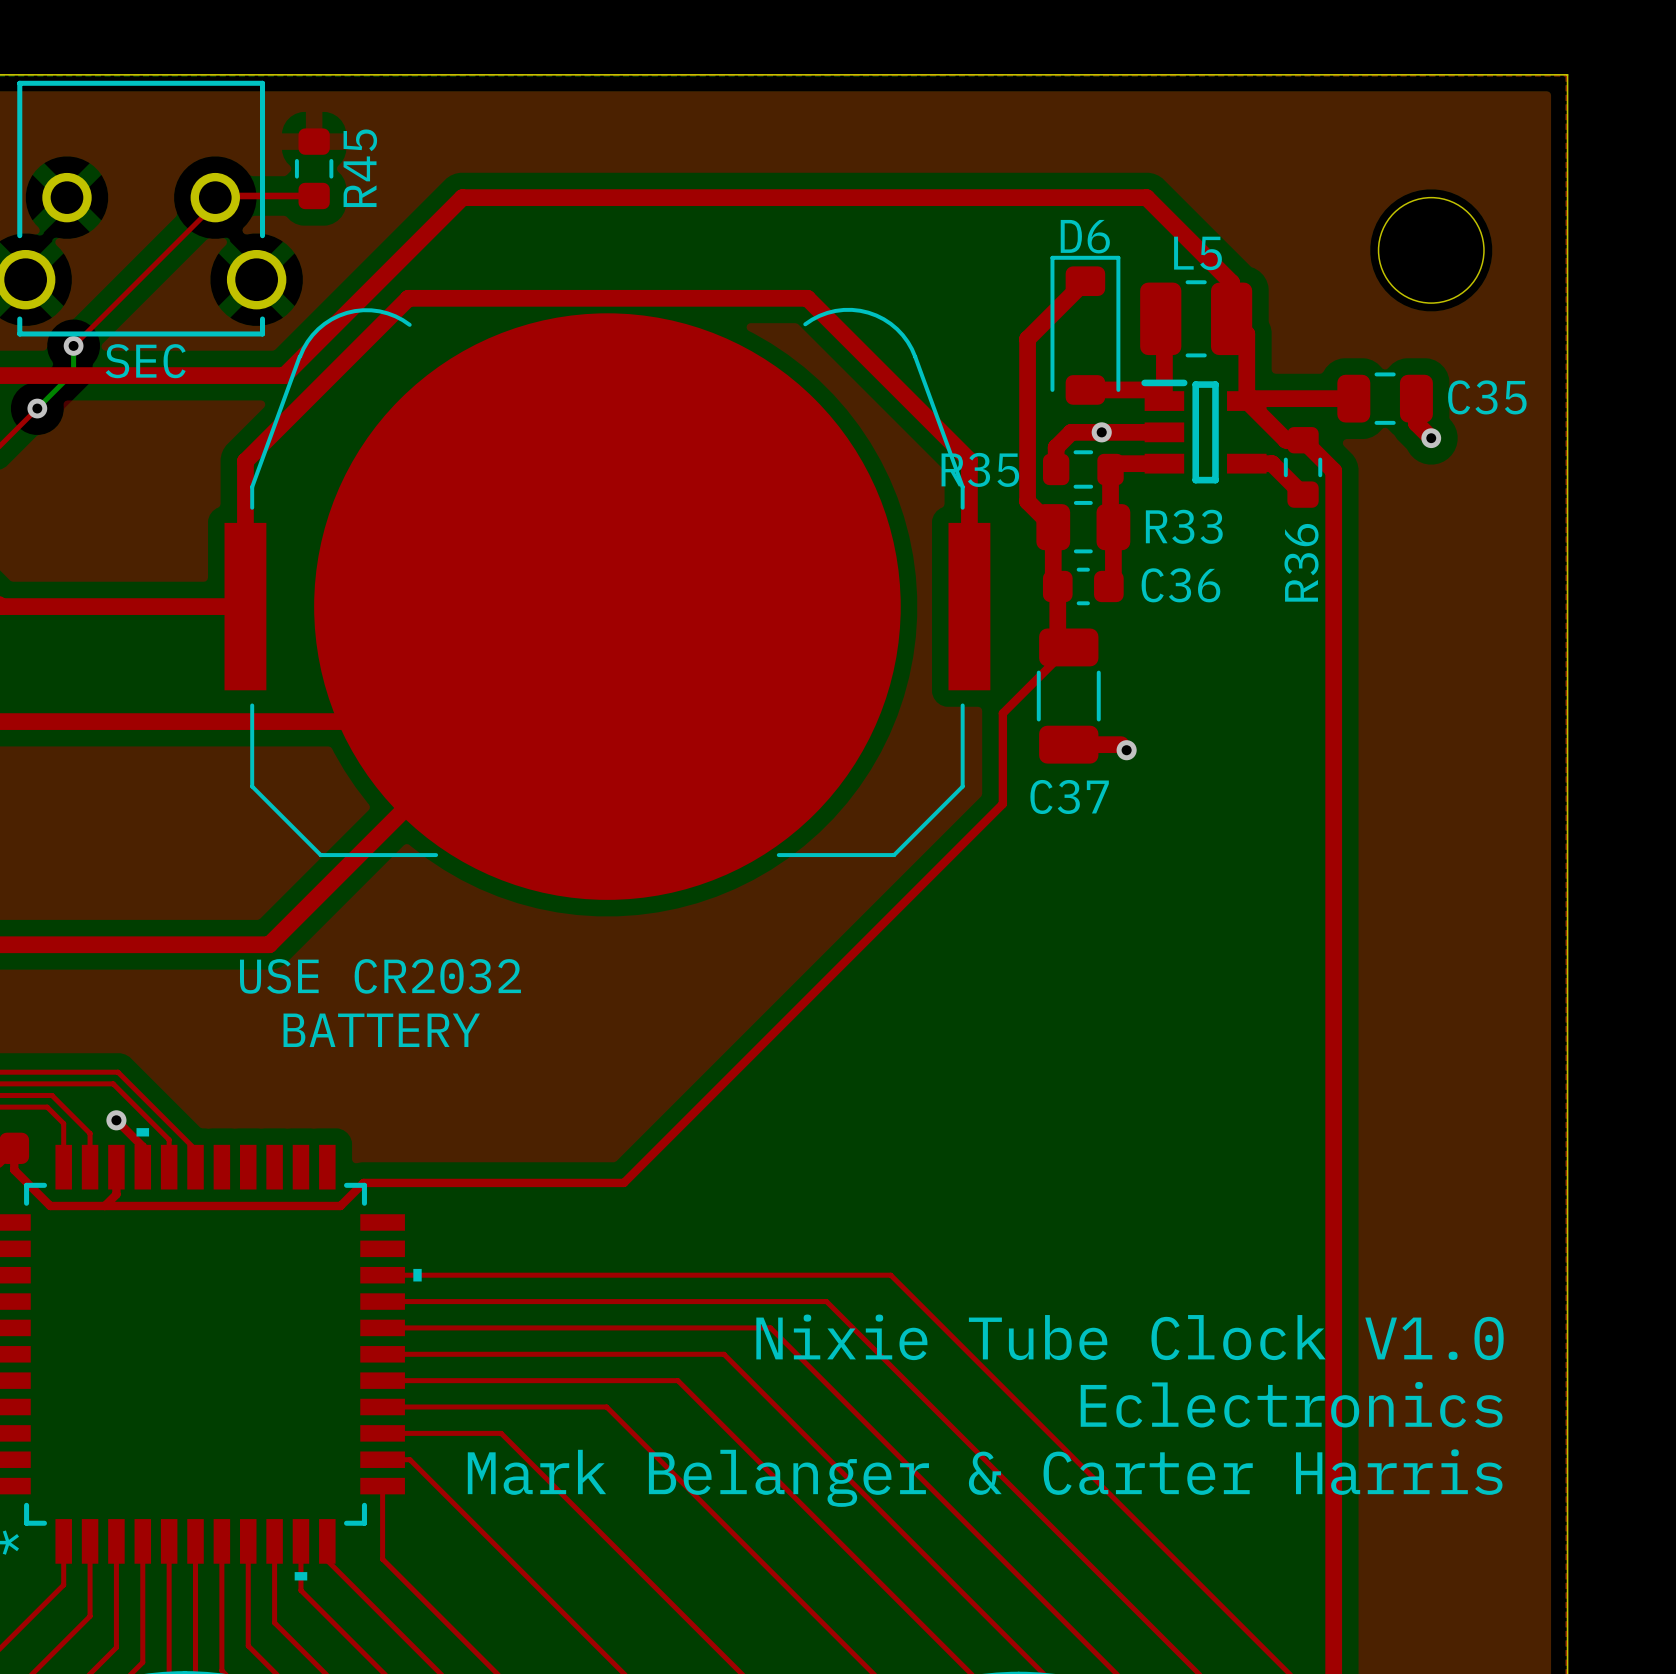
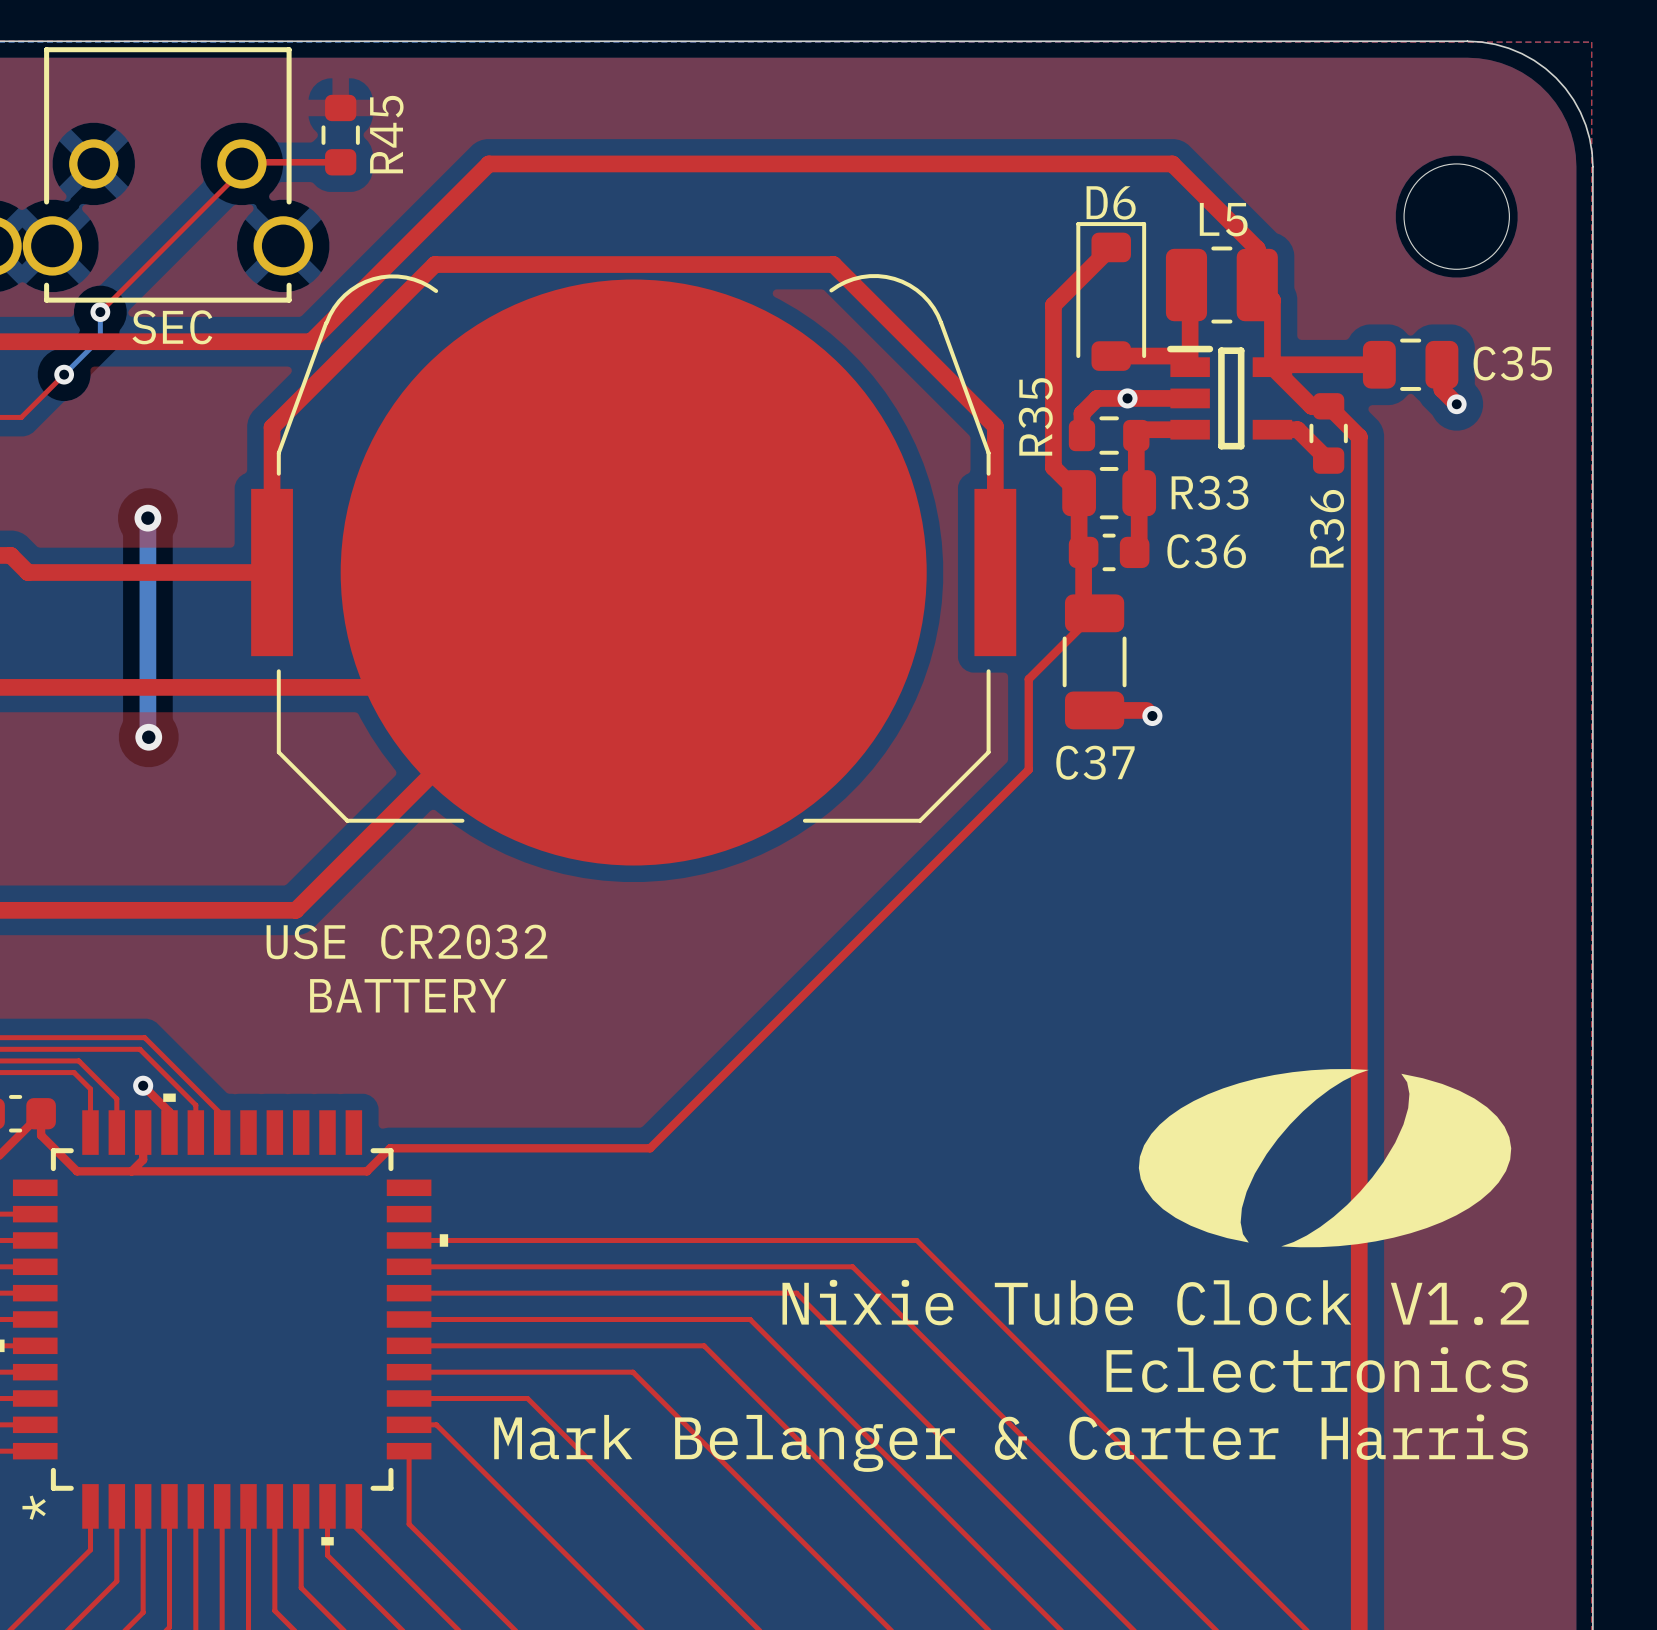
board edge: (1441, 74) (1567, 74) (1567, 200) -> (1467, 41) (1481, 42) (1508, 48) (1534, 60) (1556, 77) (1573, 99) (1585, 125) (1592, 152) (1592, 166)
R35 name rotation: 0° (980, 469) -> 90° counterclockwise (1035, 416)
bottom track: none -> (147, 518) (148, 737)
via: none -> (147, 518)
via: none -> (148, 737)
drawing: none -> [1138, 1069, 1512, 1248]
text: Nixie Tube Clock V1.0 (1130, 1337) -> Nixie Tube Clock V1.2 (1155, 1302)

